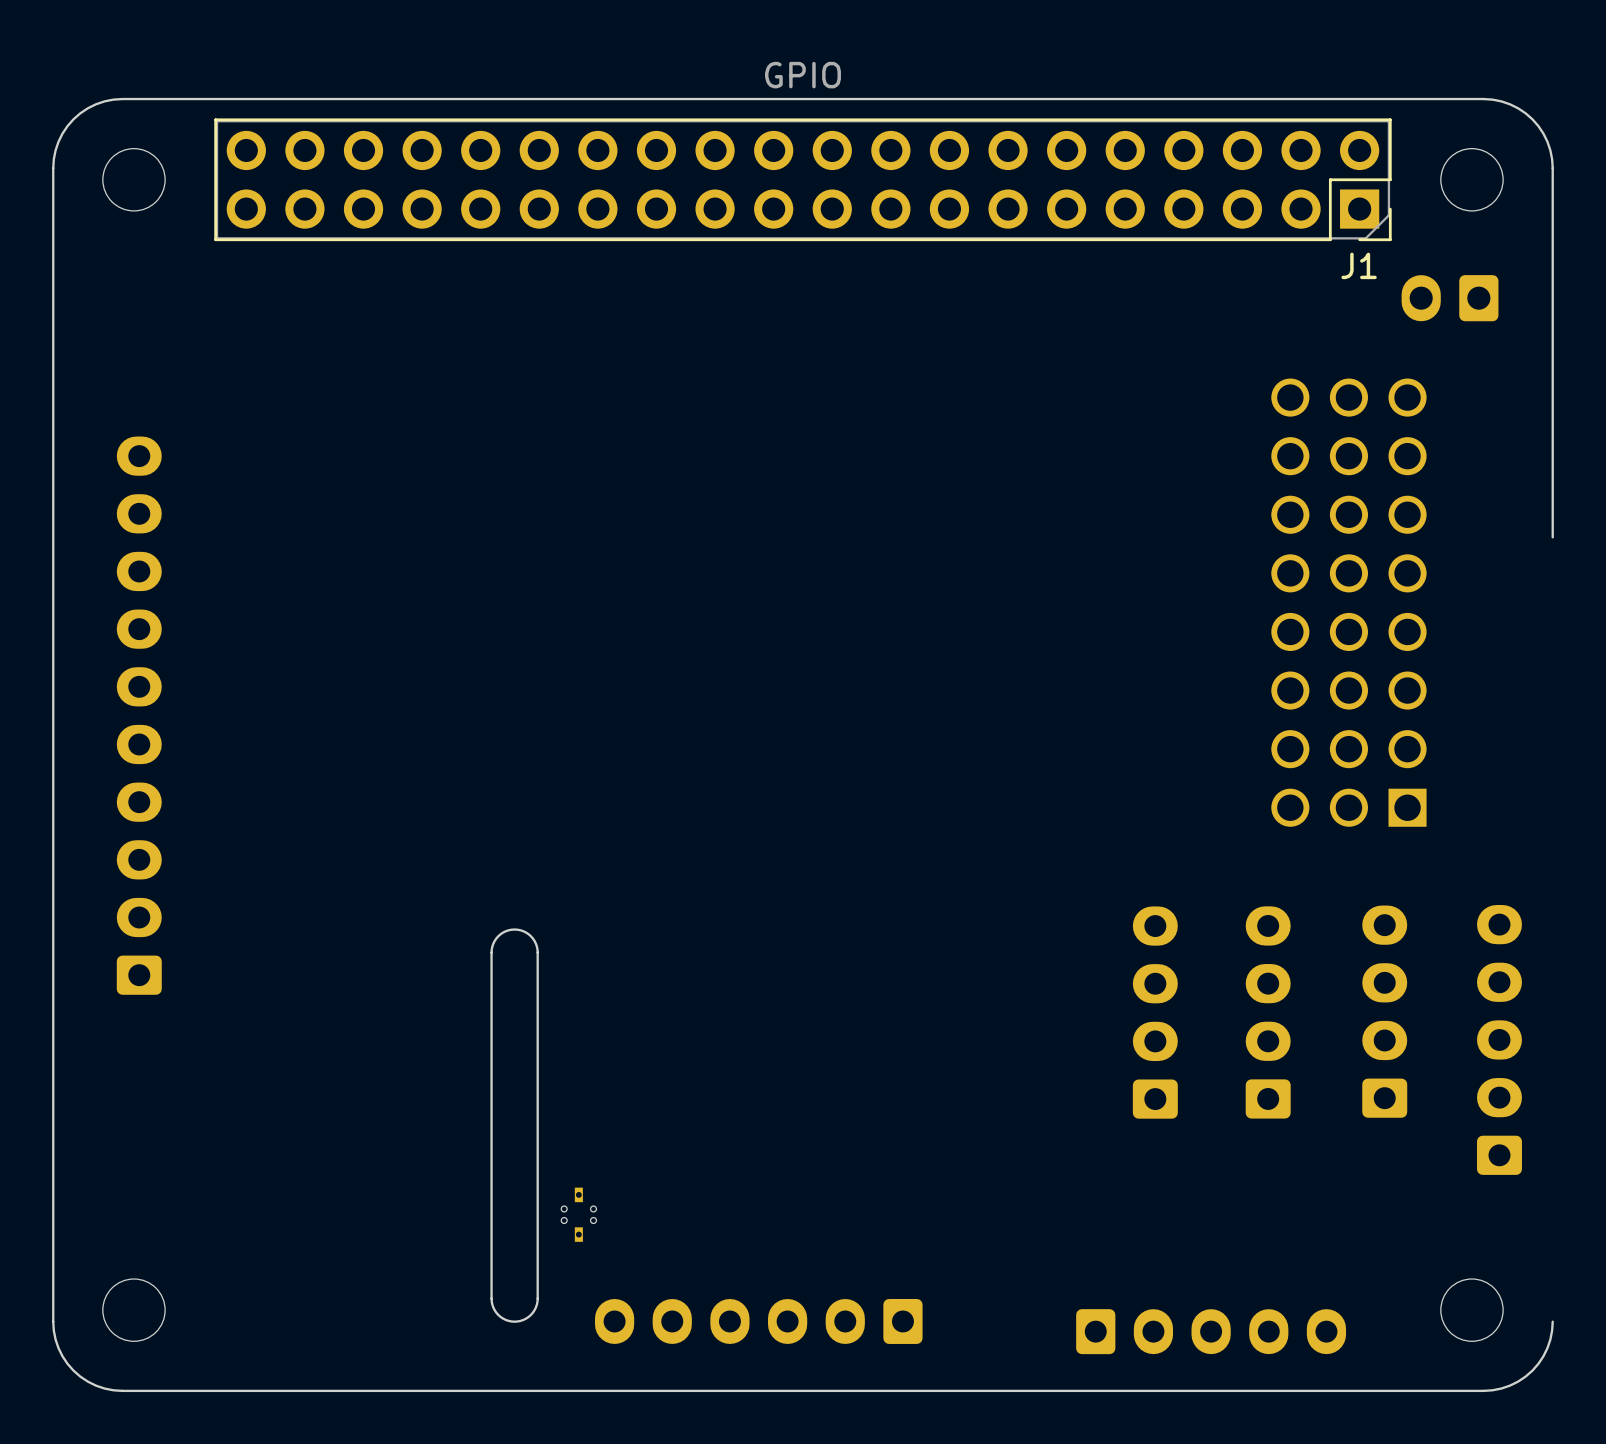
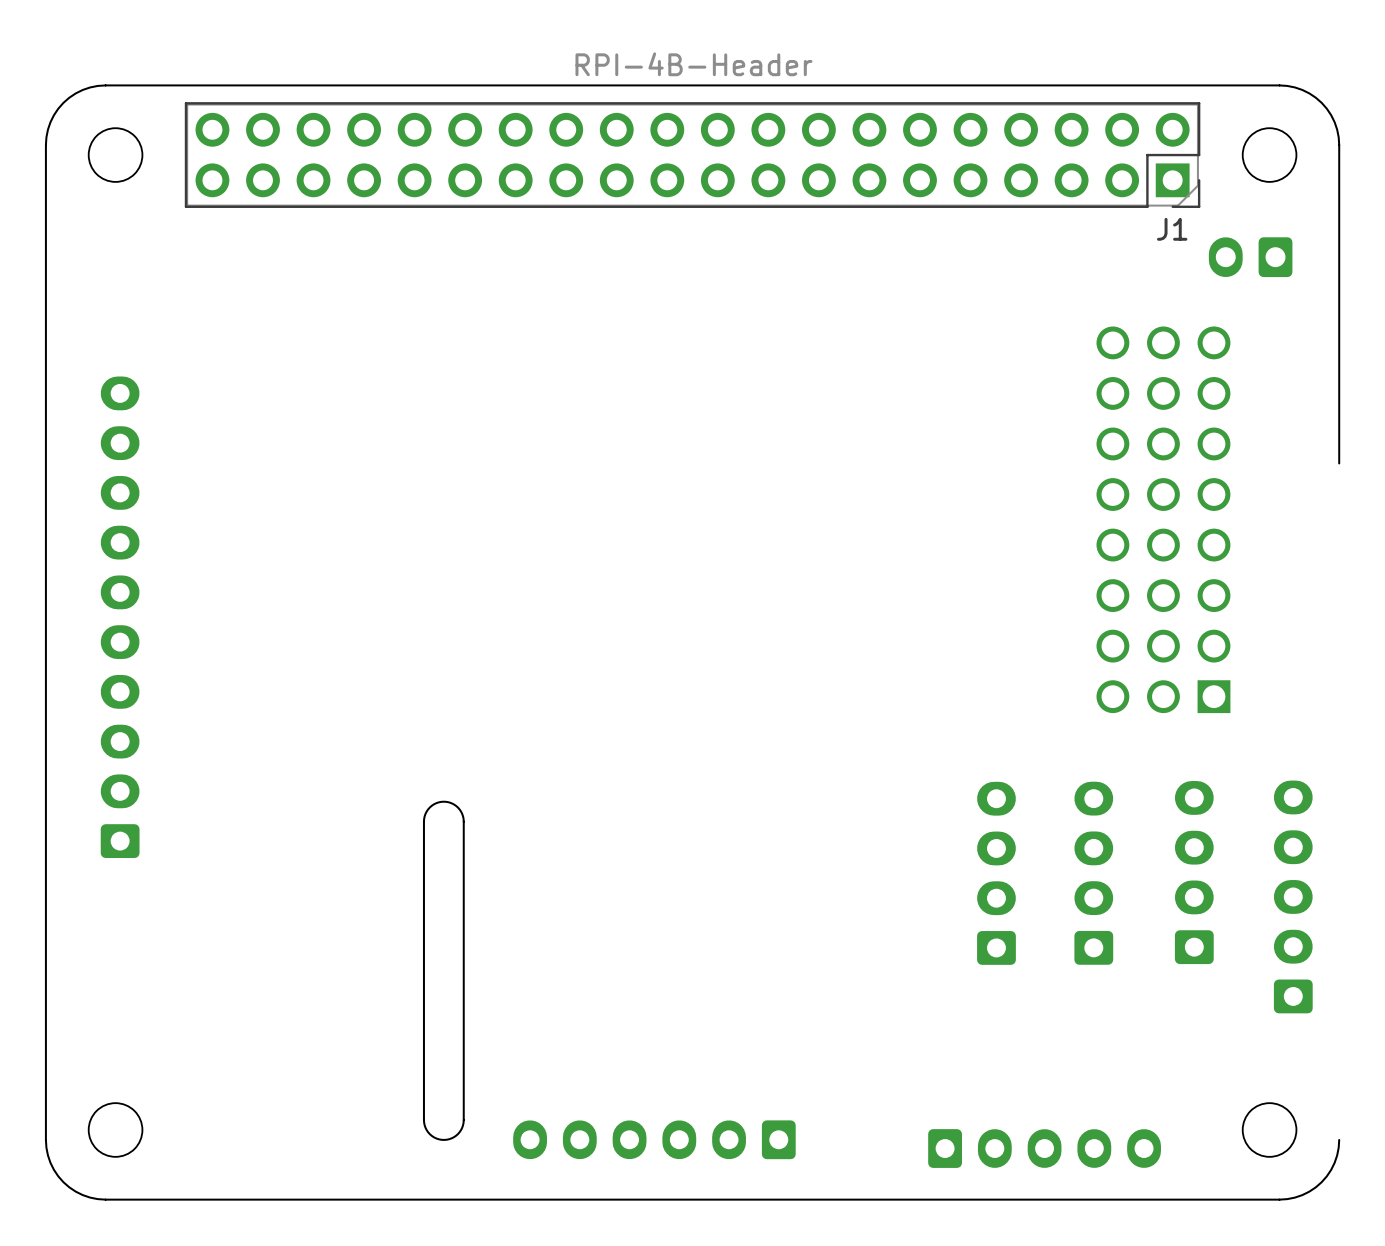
J1 value: GPIO (802, 75) -> RPI-4B-Header (693, 64)
part: (578, 1214) -> none

